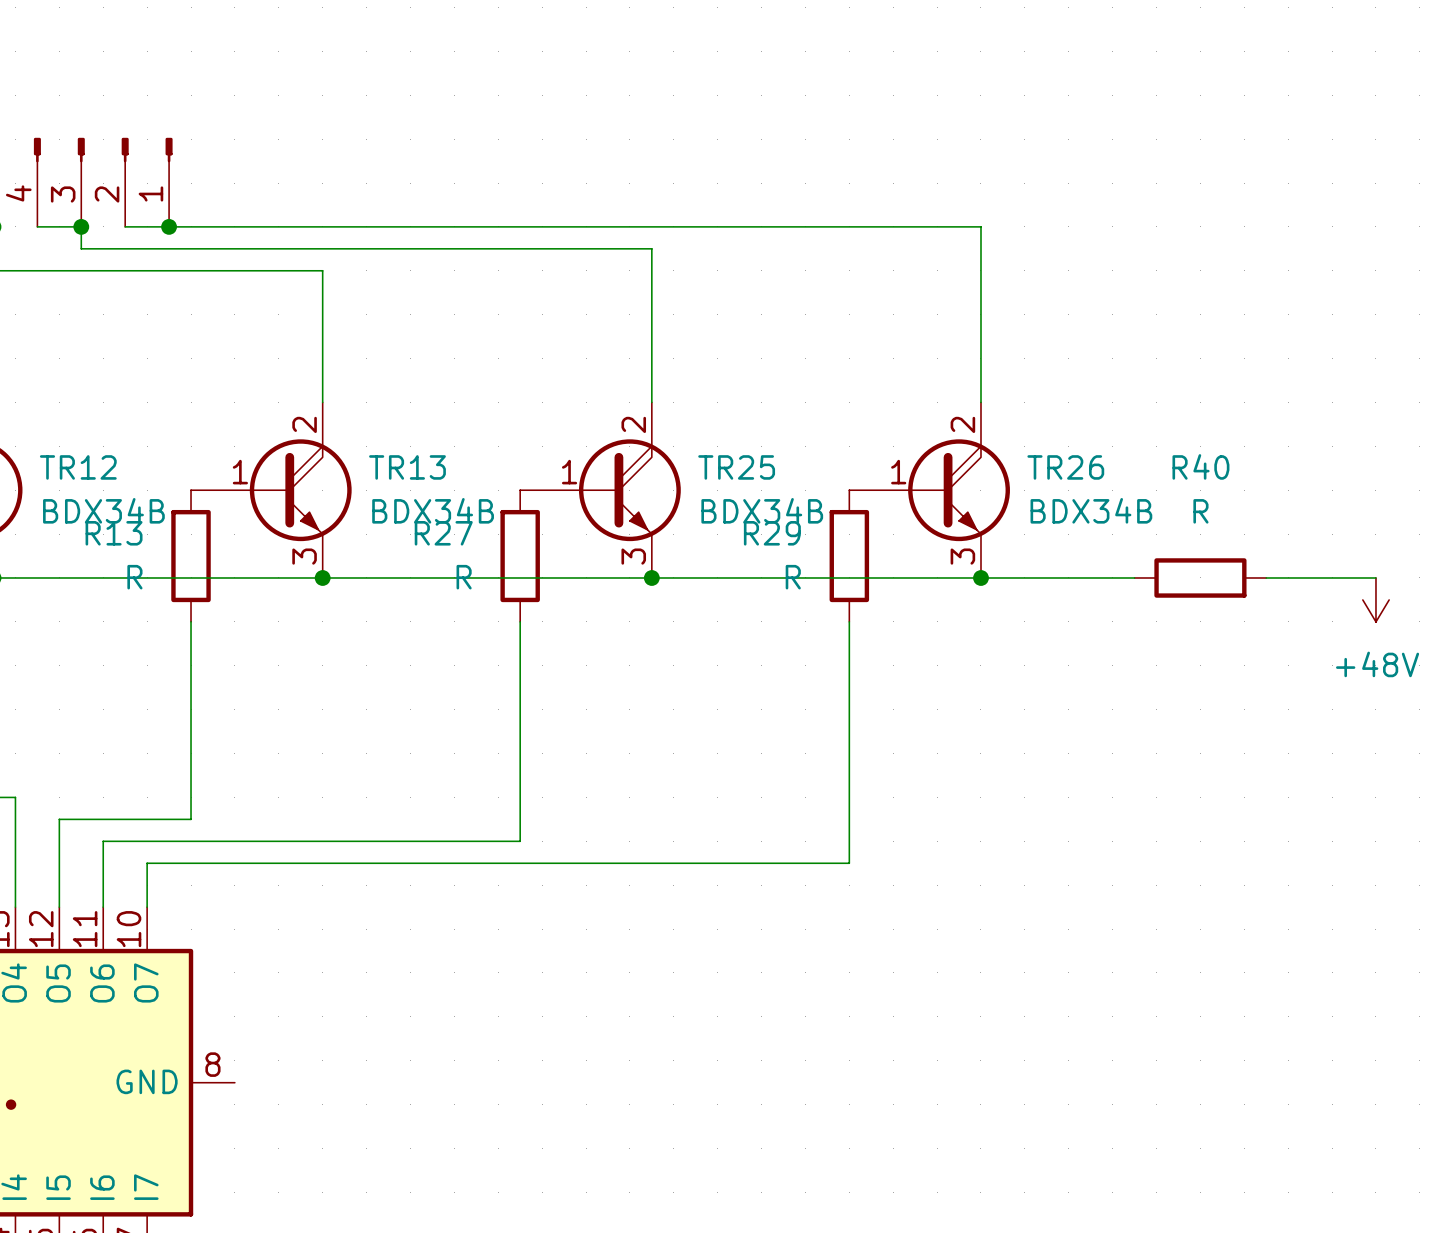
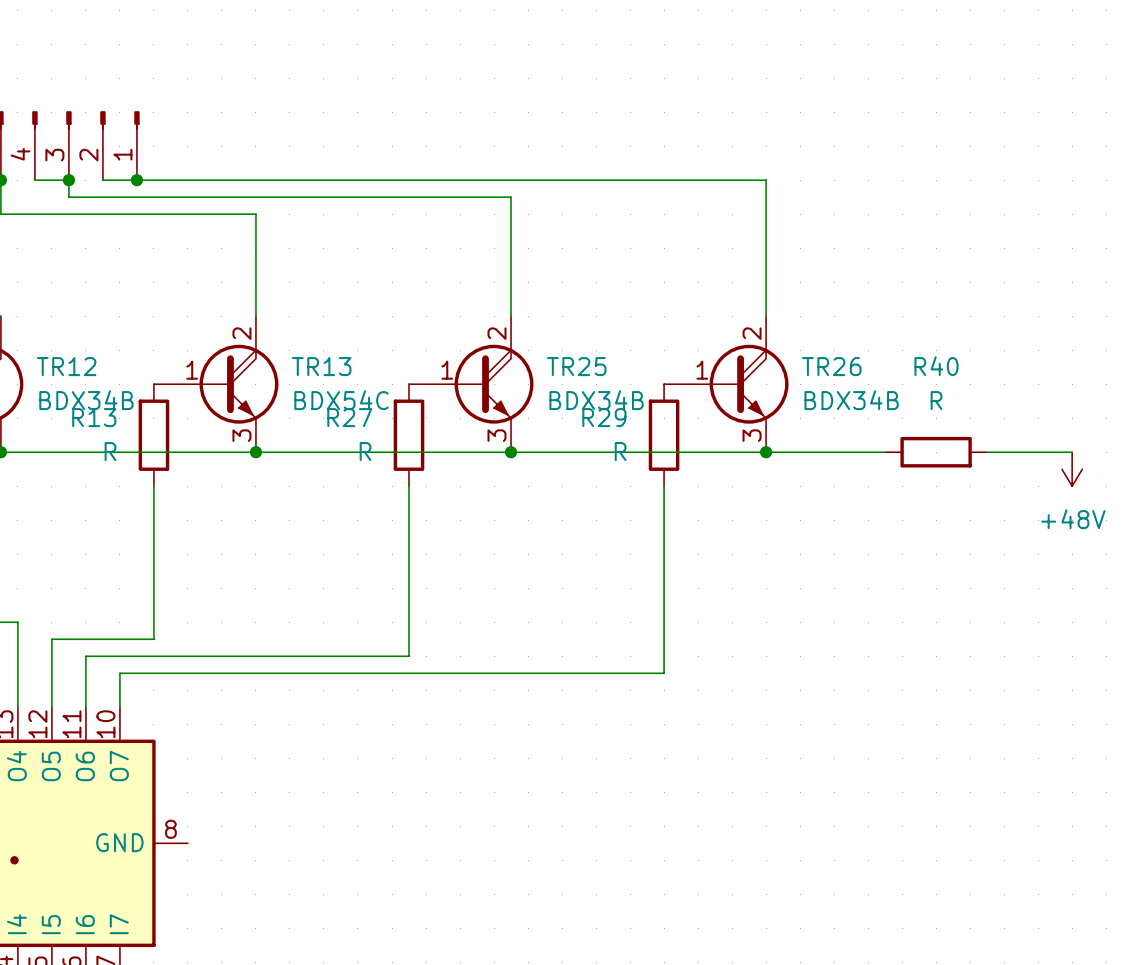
TR13 value: BDX34B (433, 510) -> BDX54C (341, 400)

